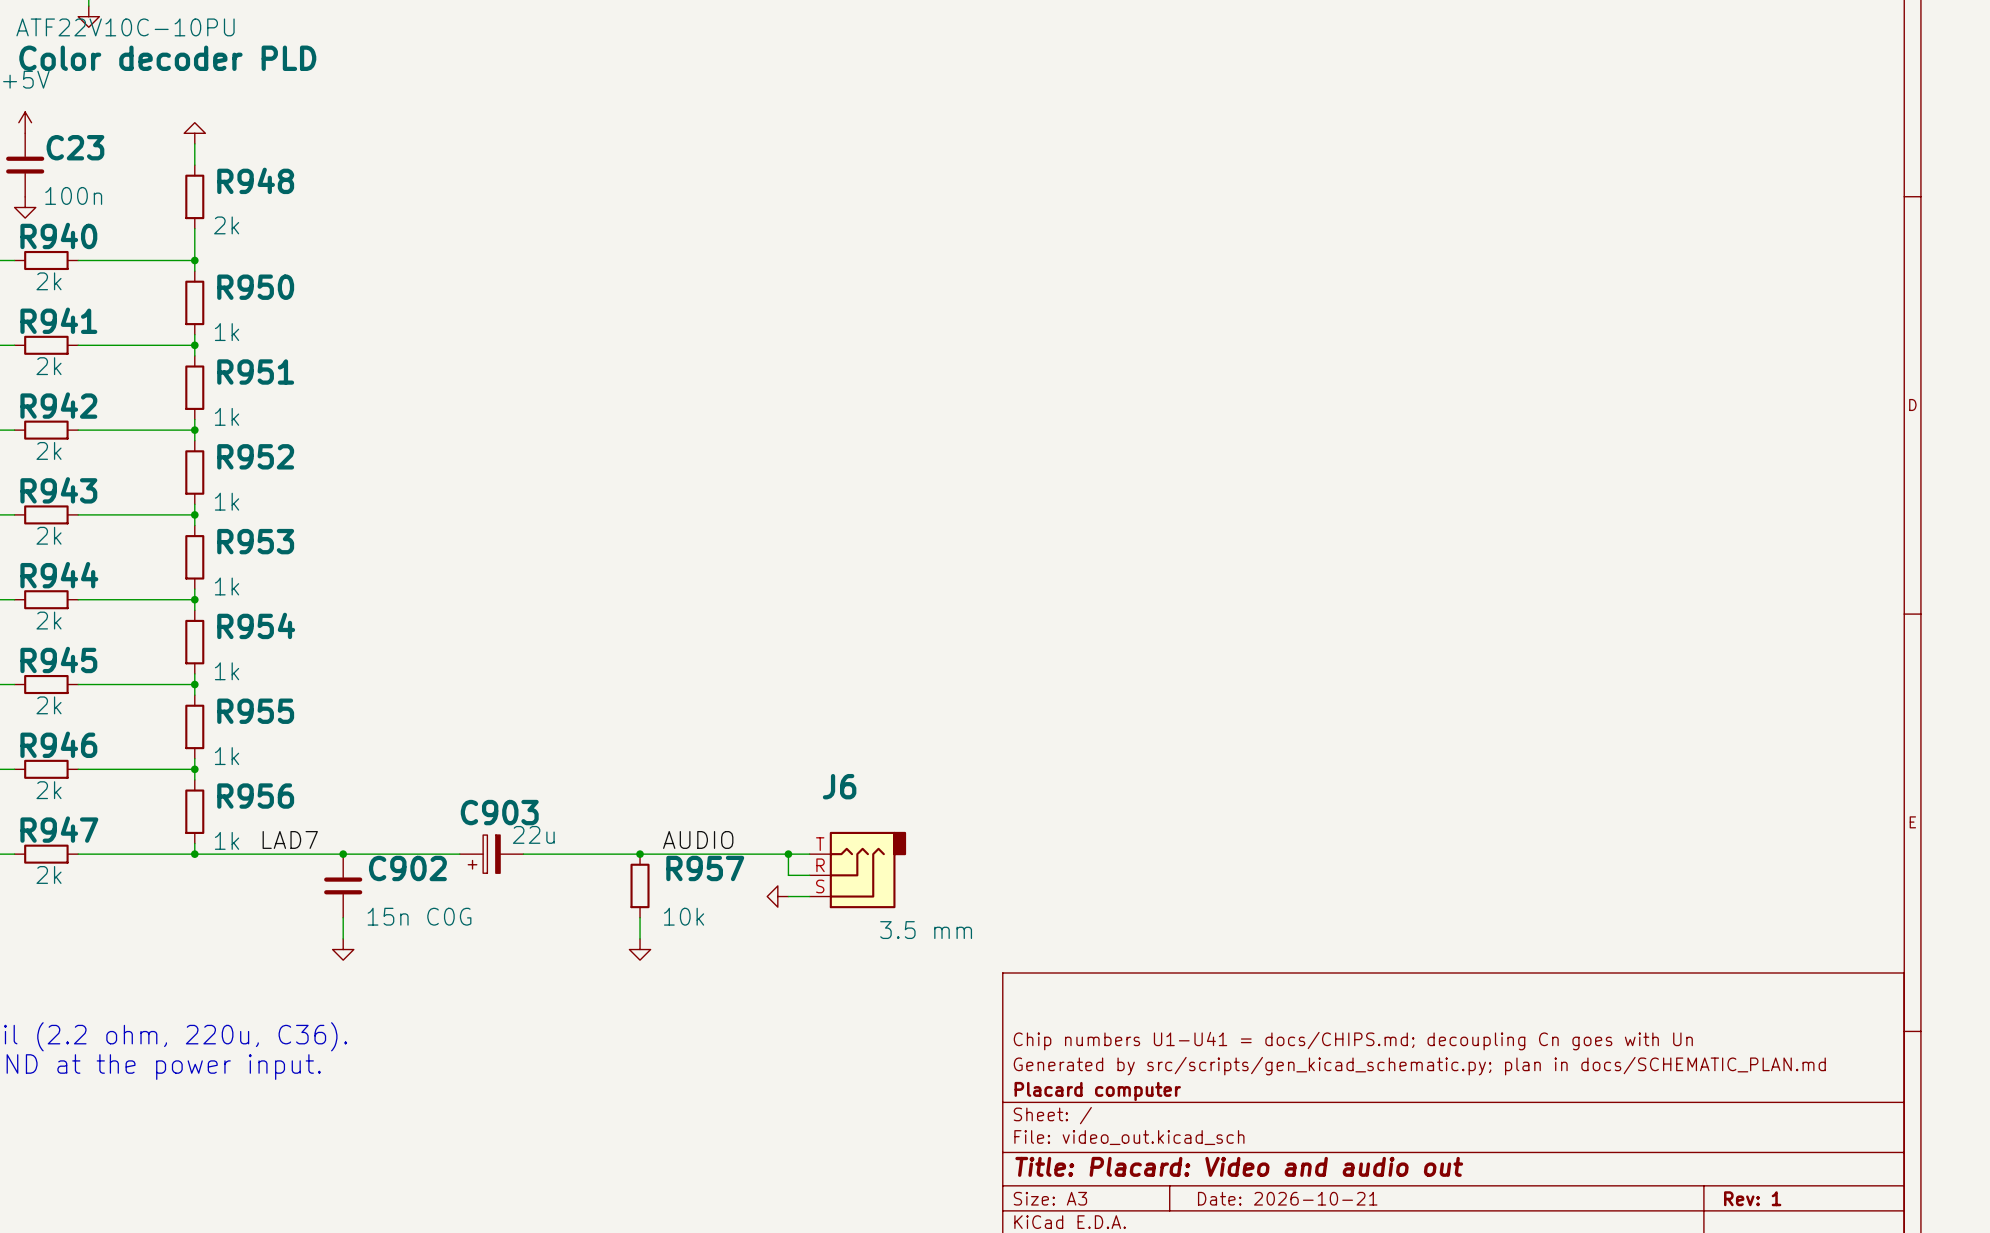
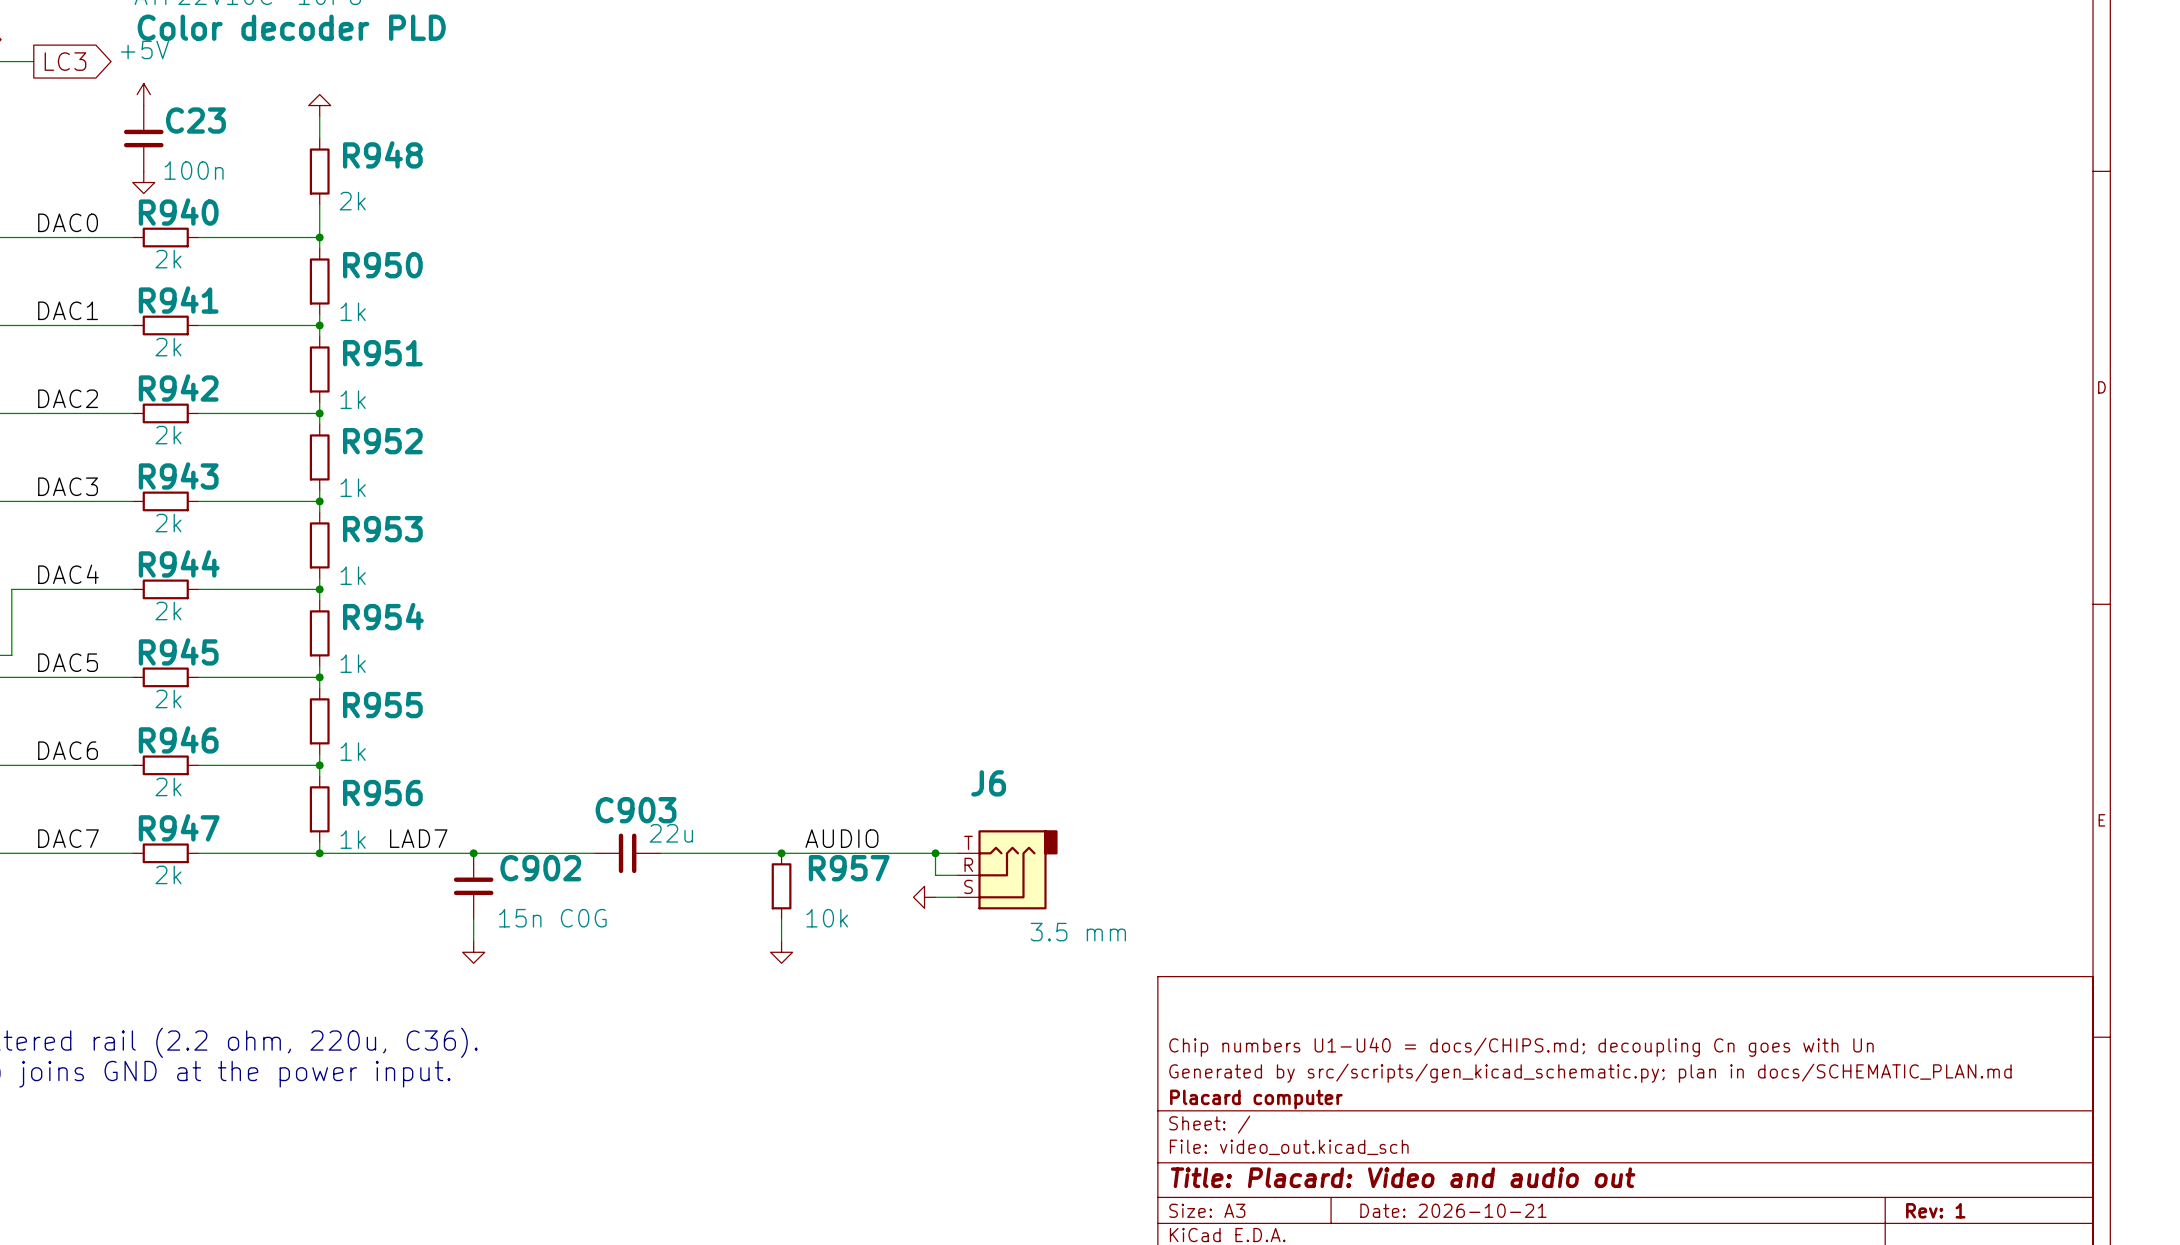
C903 symbol: [459, 835, 524, 874] -> [594, 833, 661, 874]
title block: Chip numbers U1-U41 = docs/CHIPS.md; decoupling Cn goes with Un (1353, 1041) -> Chip numbers U1-U40 = docs/CHIPS.md; decoupling Cn goes with Un (1521, 1047)

